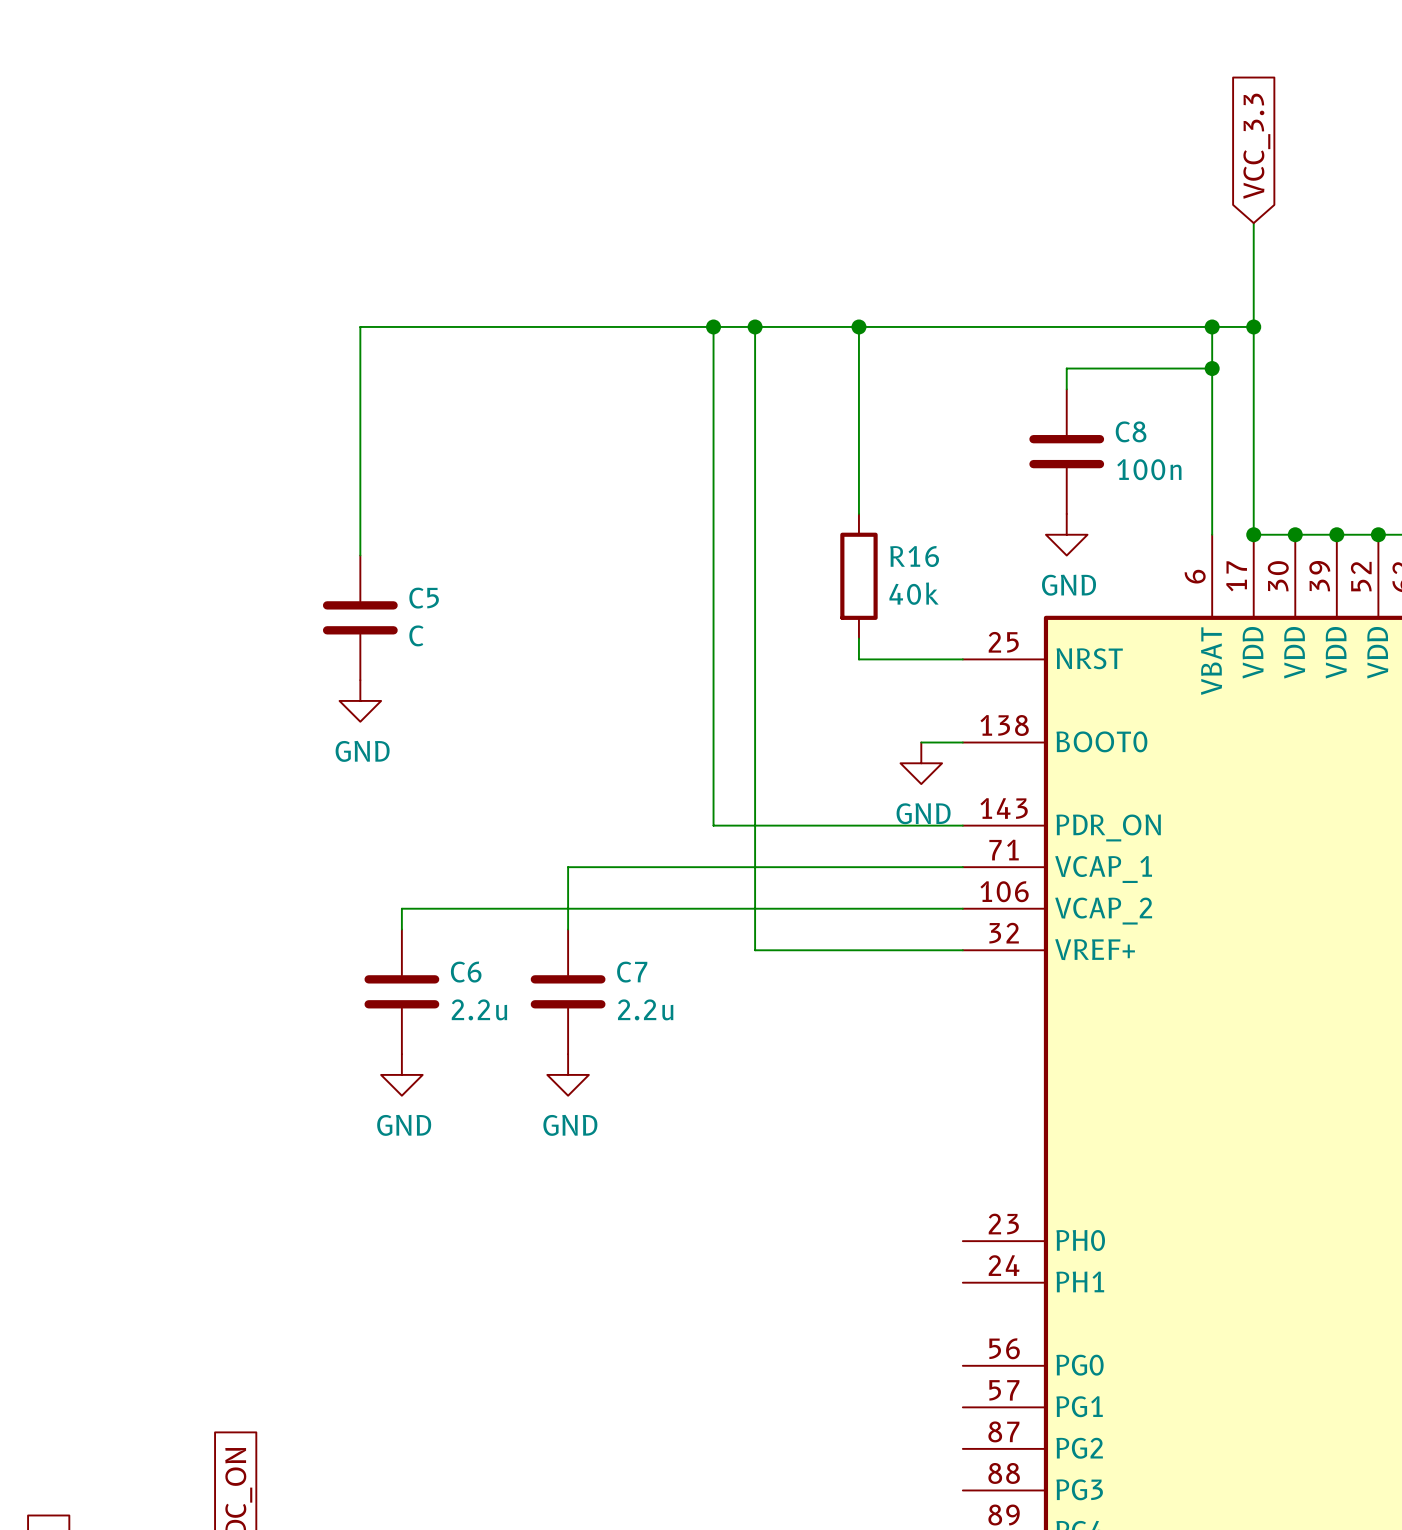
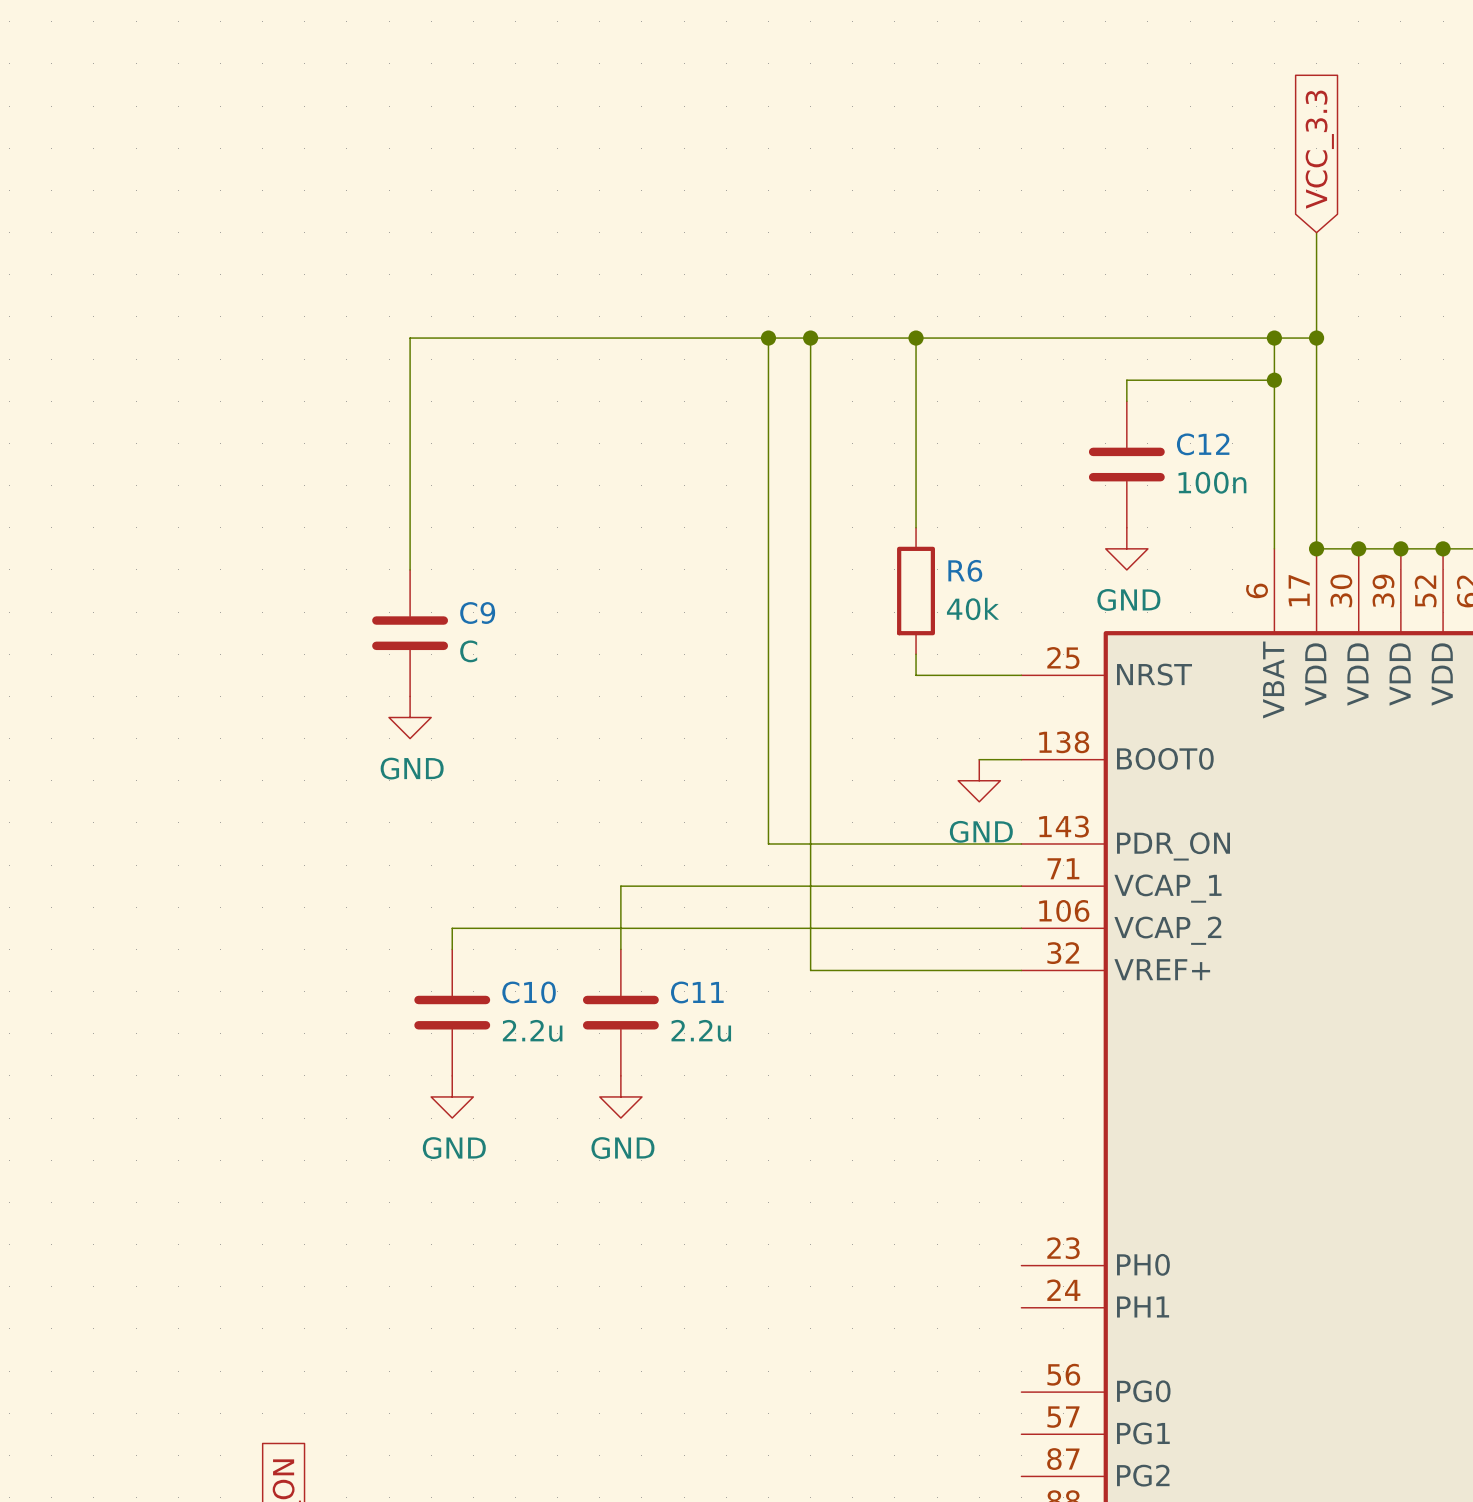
C8 name: C8 (1131, 431) -> C12 (1203, 444)
R16 name: R16 (914, 556) -> R6 (965, 570)
C5 name: C5 (424, 598) -> C9 (477, 613)
C6 name: C6 (466, 972) -> C10 (529, 992)
C7 name: C7 (632, 972) -> C11 (697, 992)

